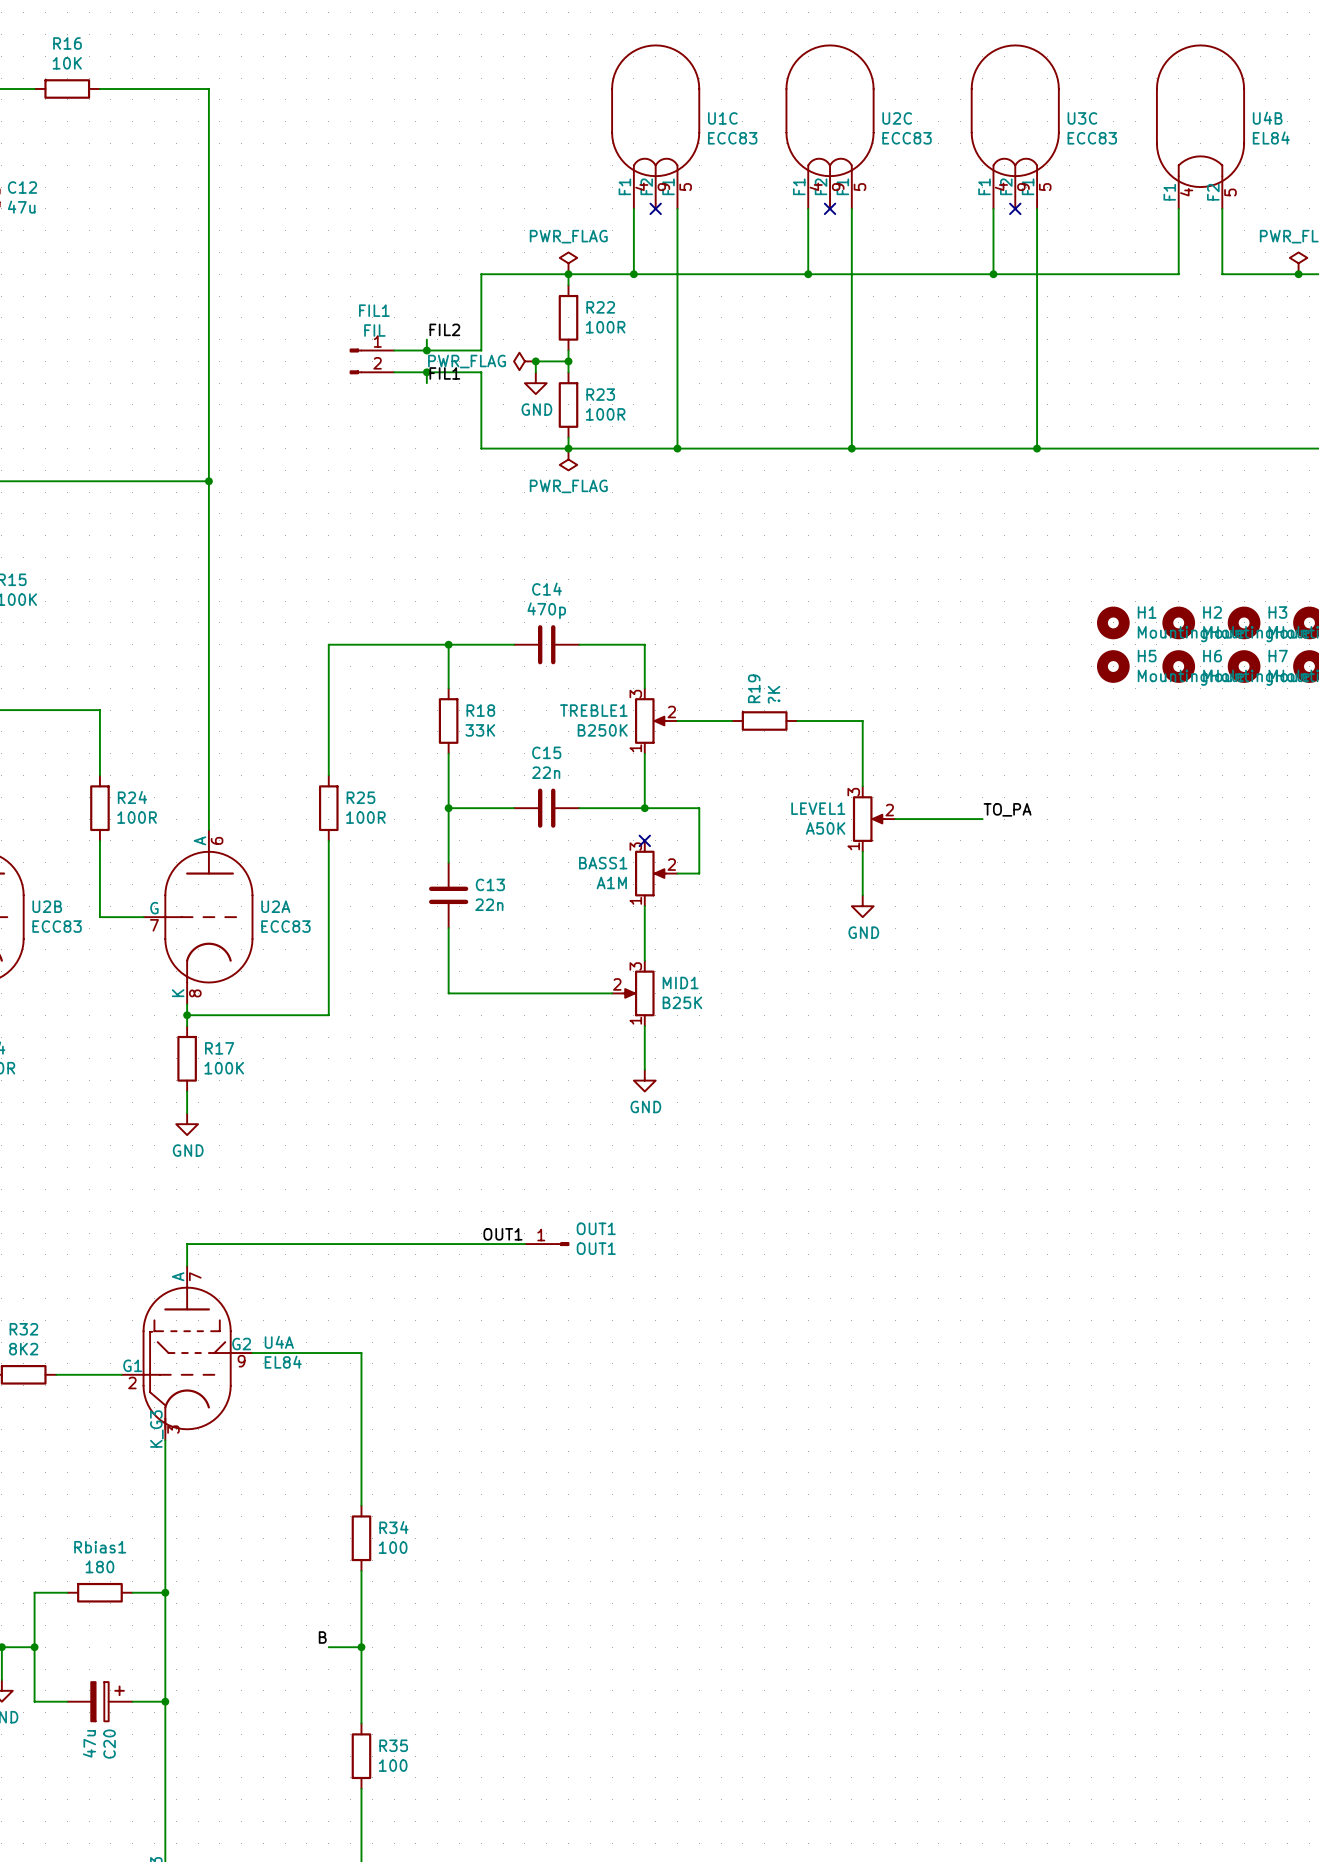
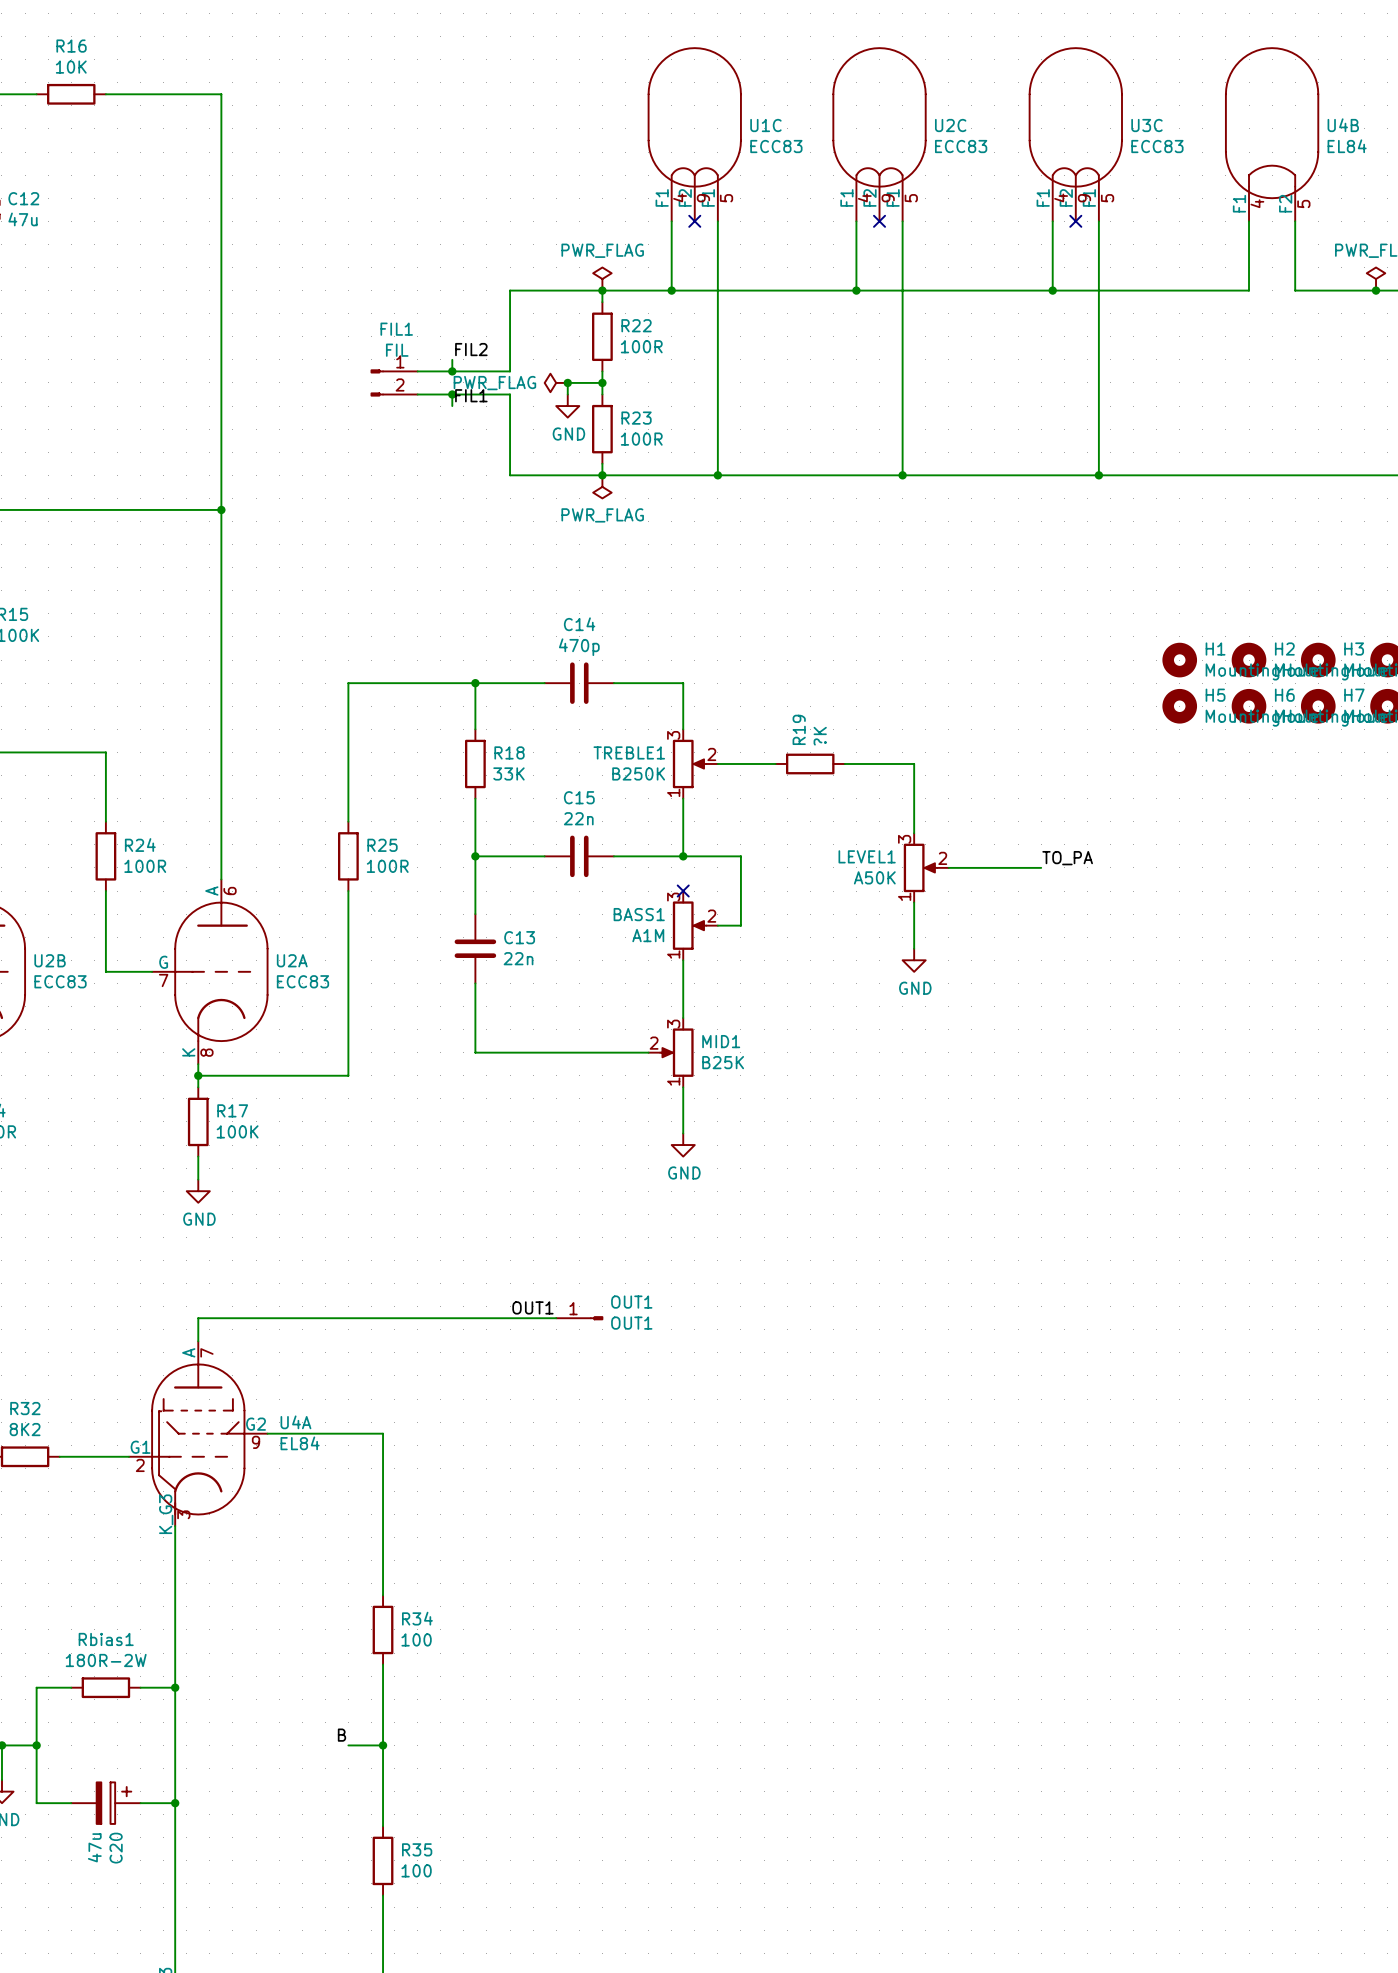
Rbias1 value: 180 (99, 1567) -> 180R-2W (106, 1660)

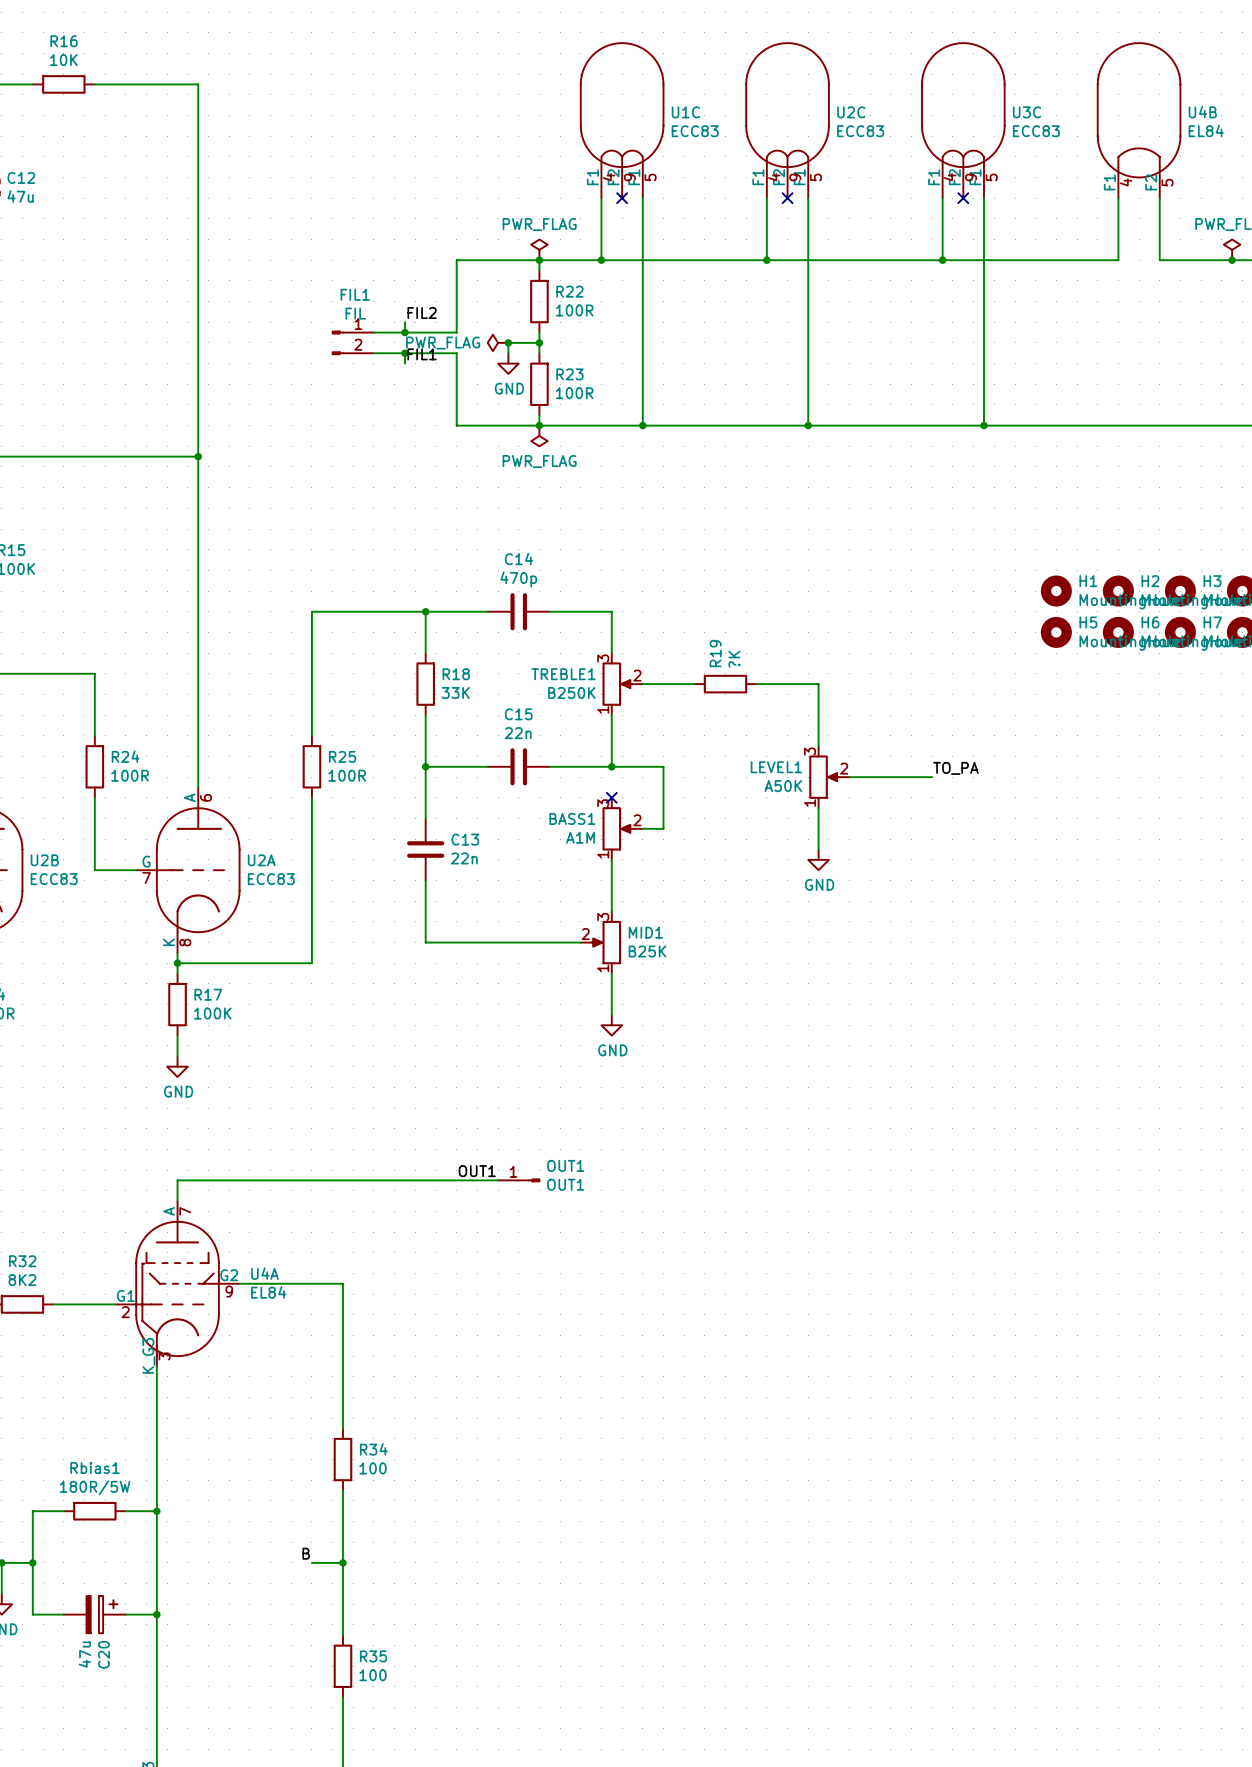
Rbias1 value: 180R-2W (106, 1660) -> 180R/5W (95, 1487)

